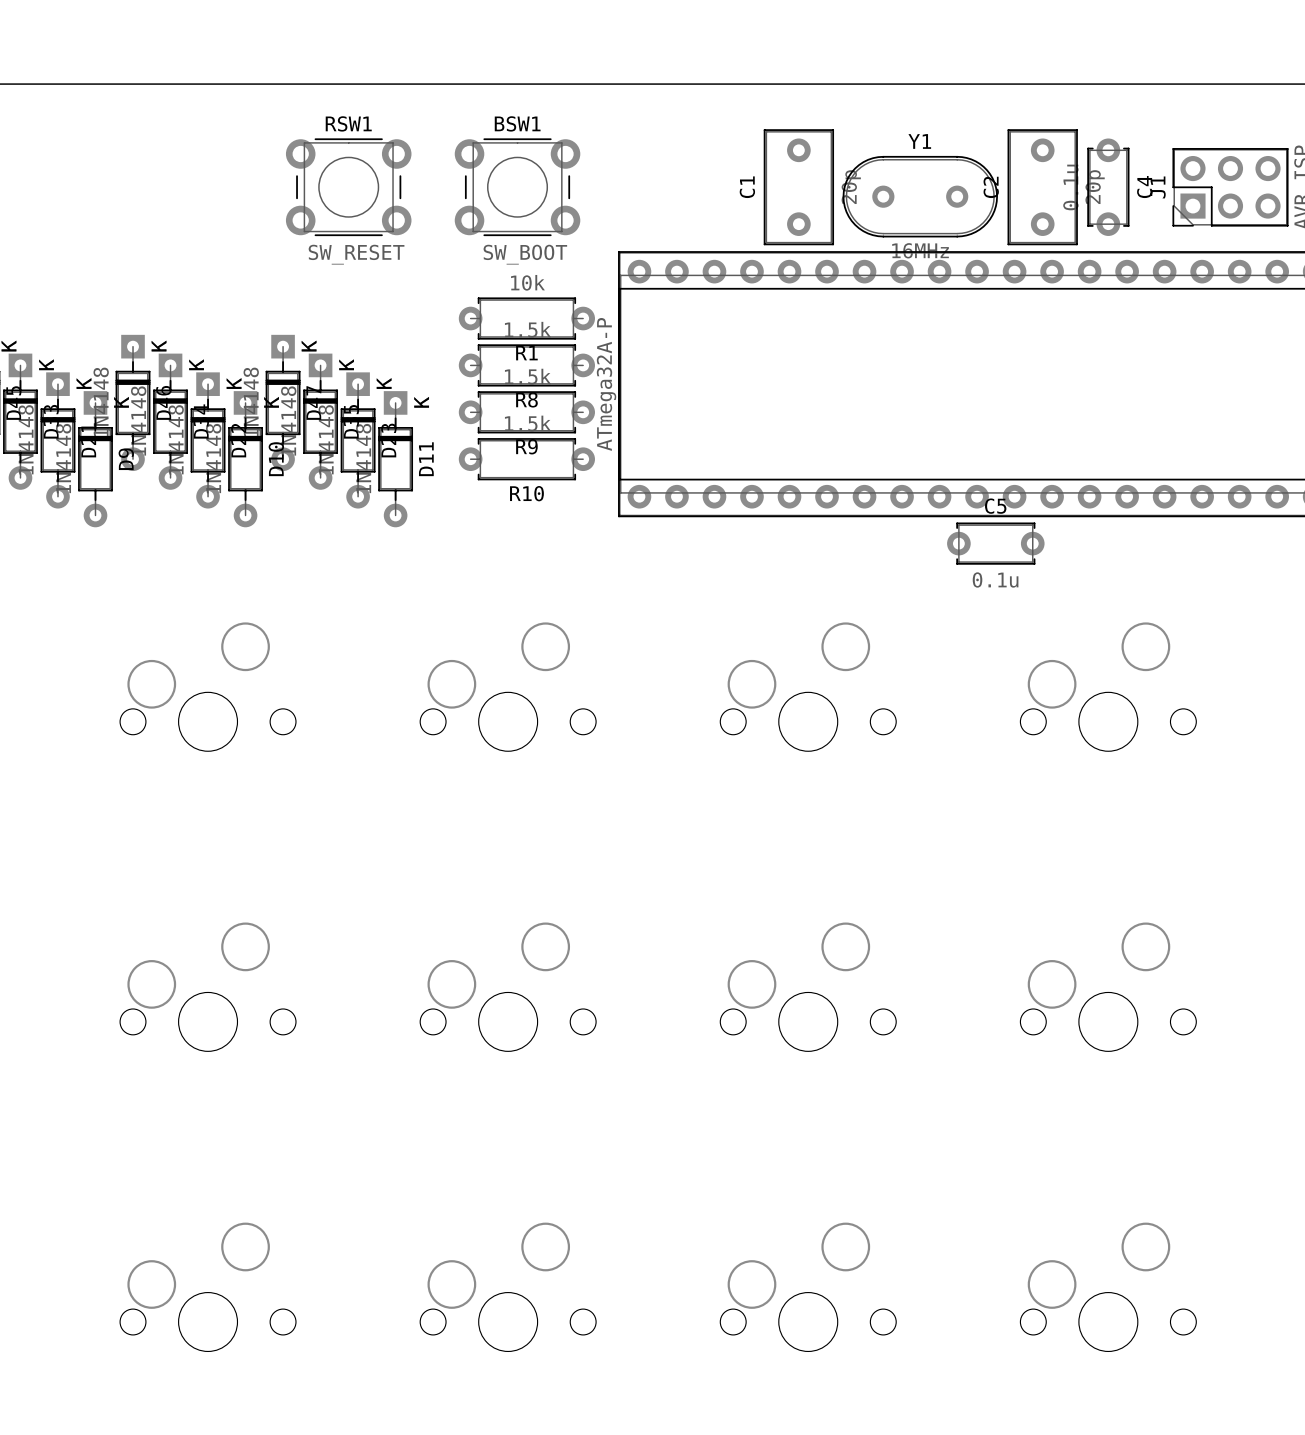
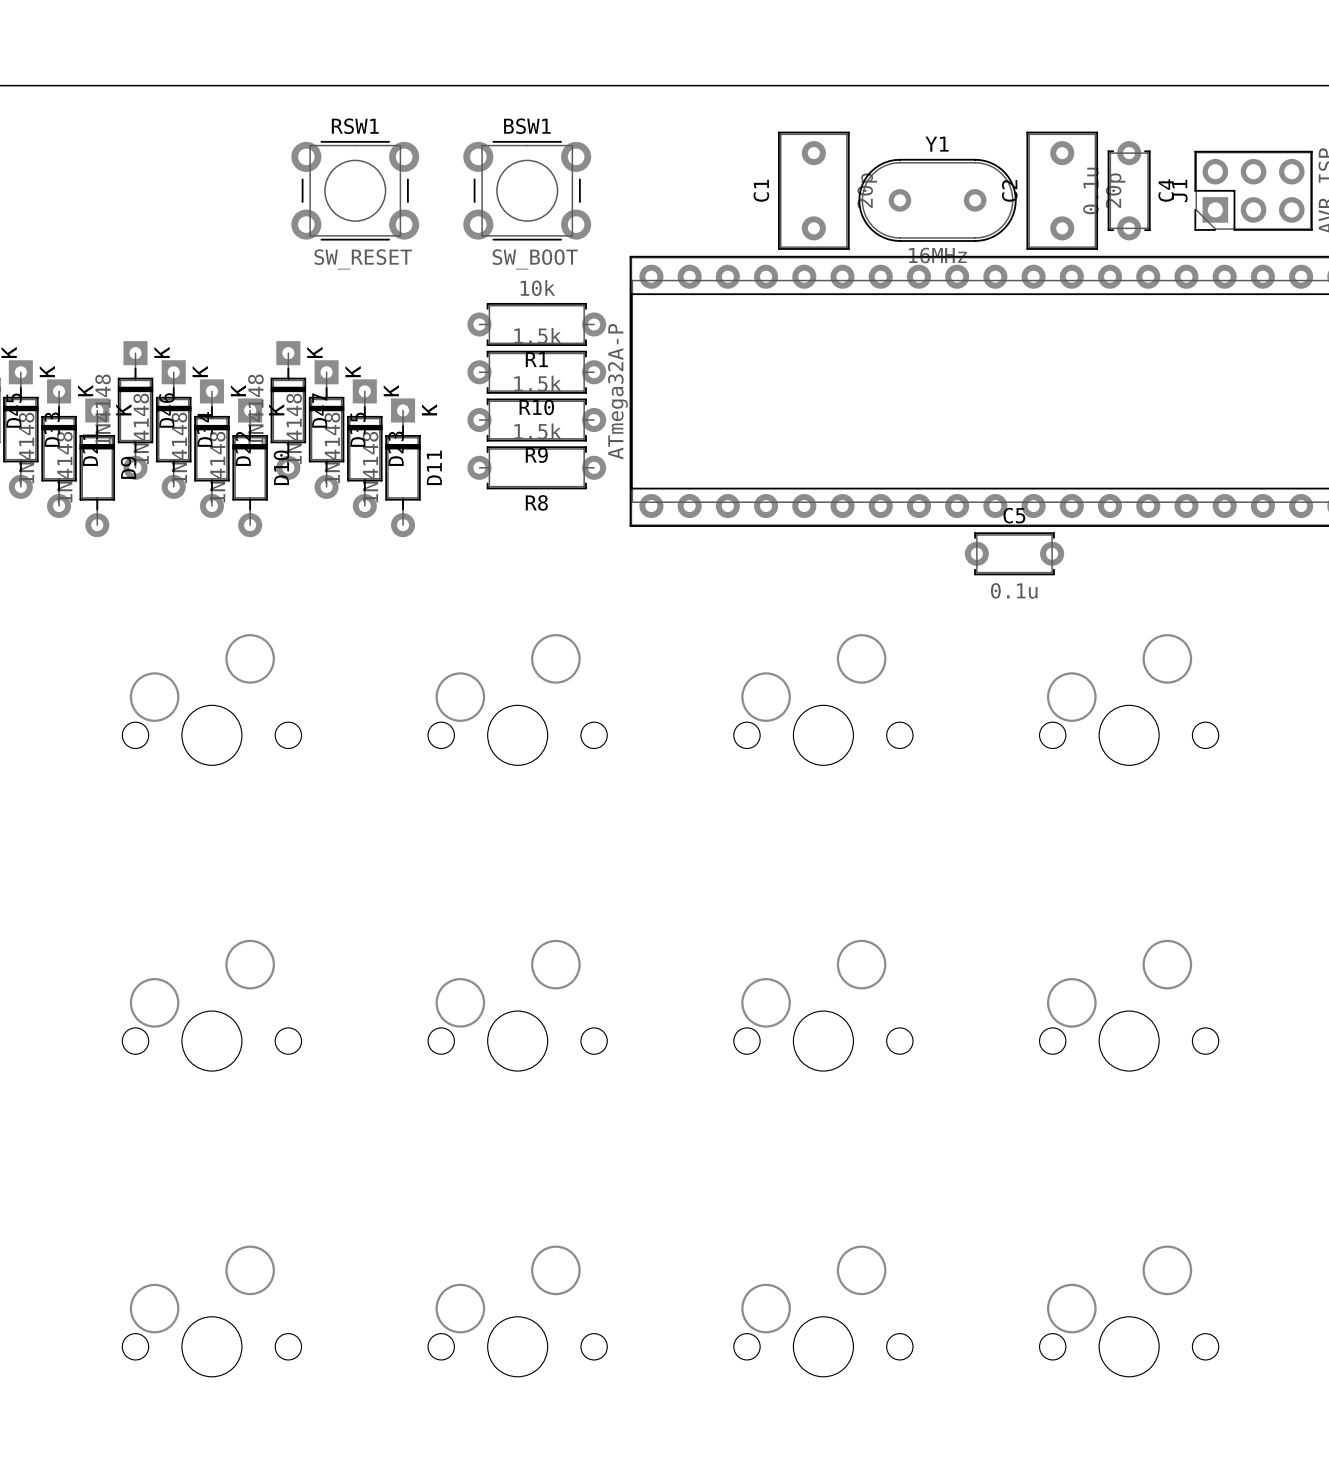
R8 name: R8 (526, 399) -> R10 (536, 407)
R10 name: R10 (526, 493) -> R8 (536, 502)

